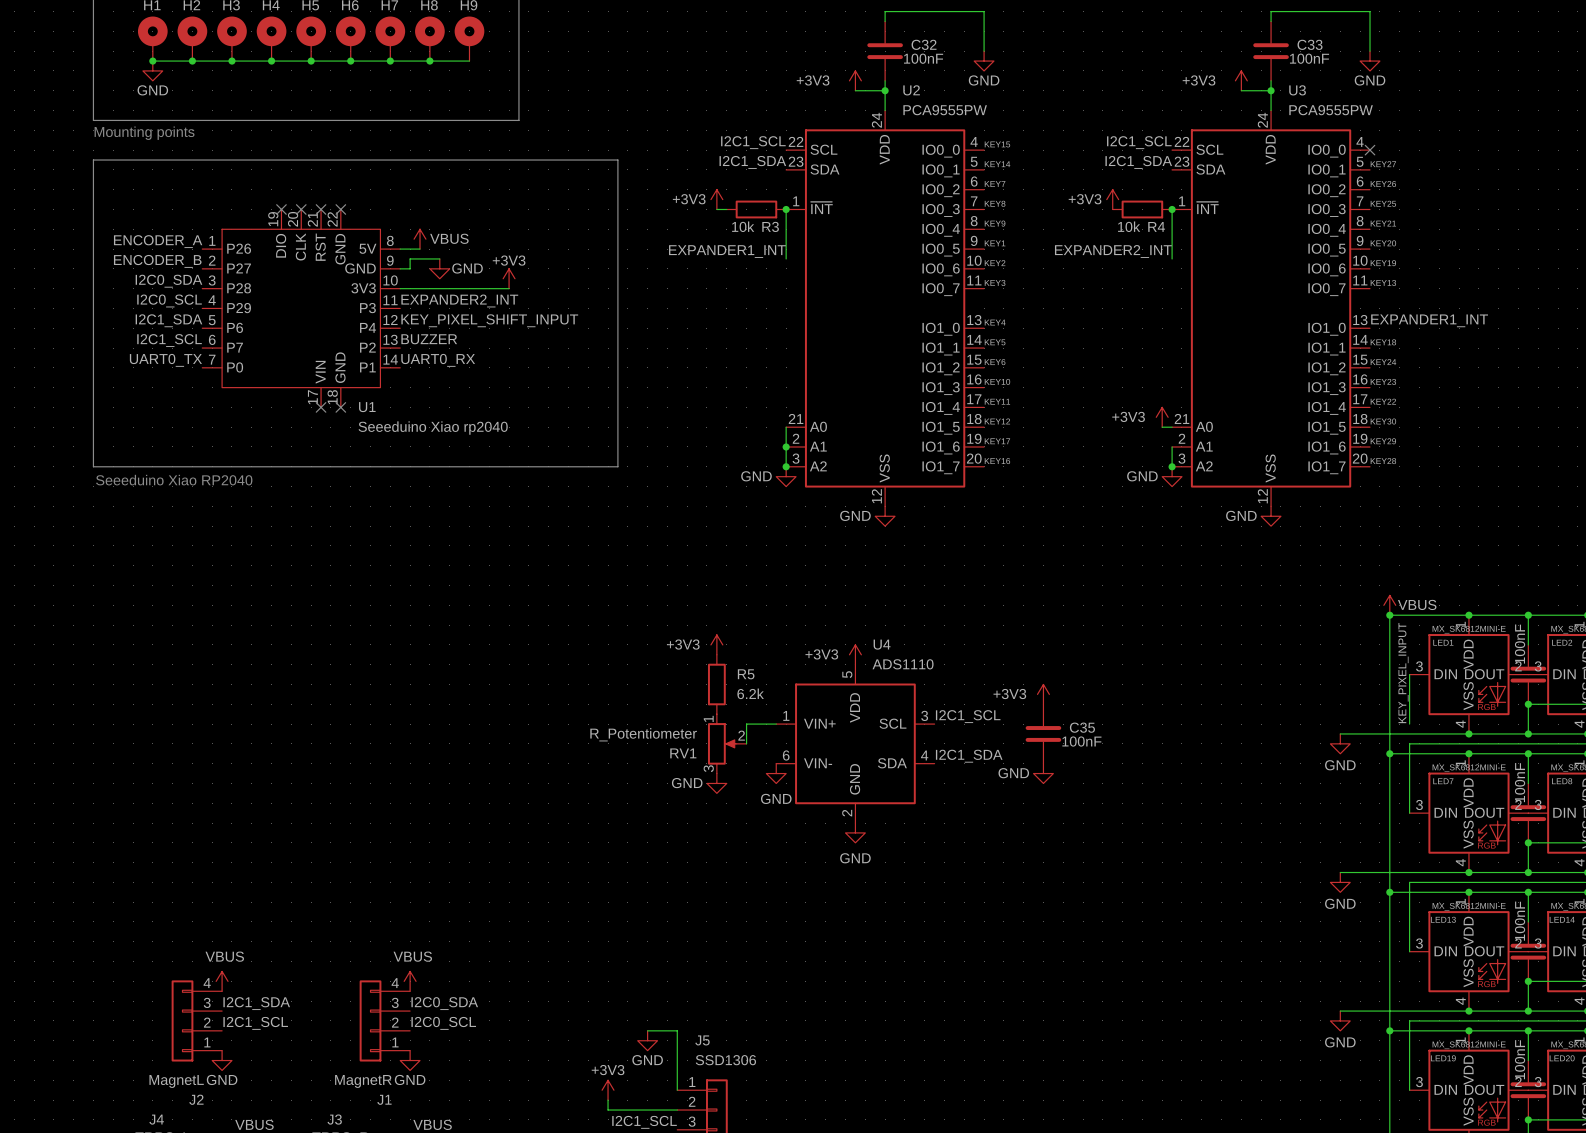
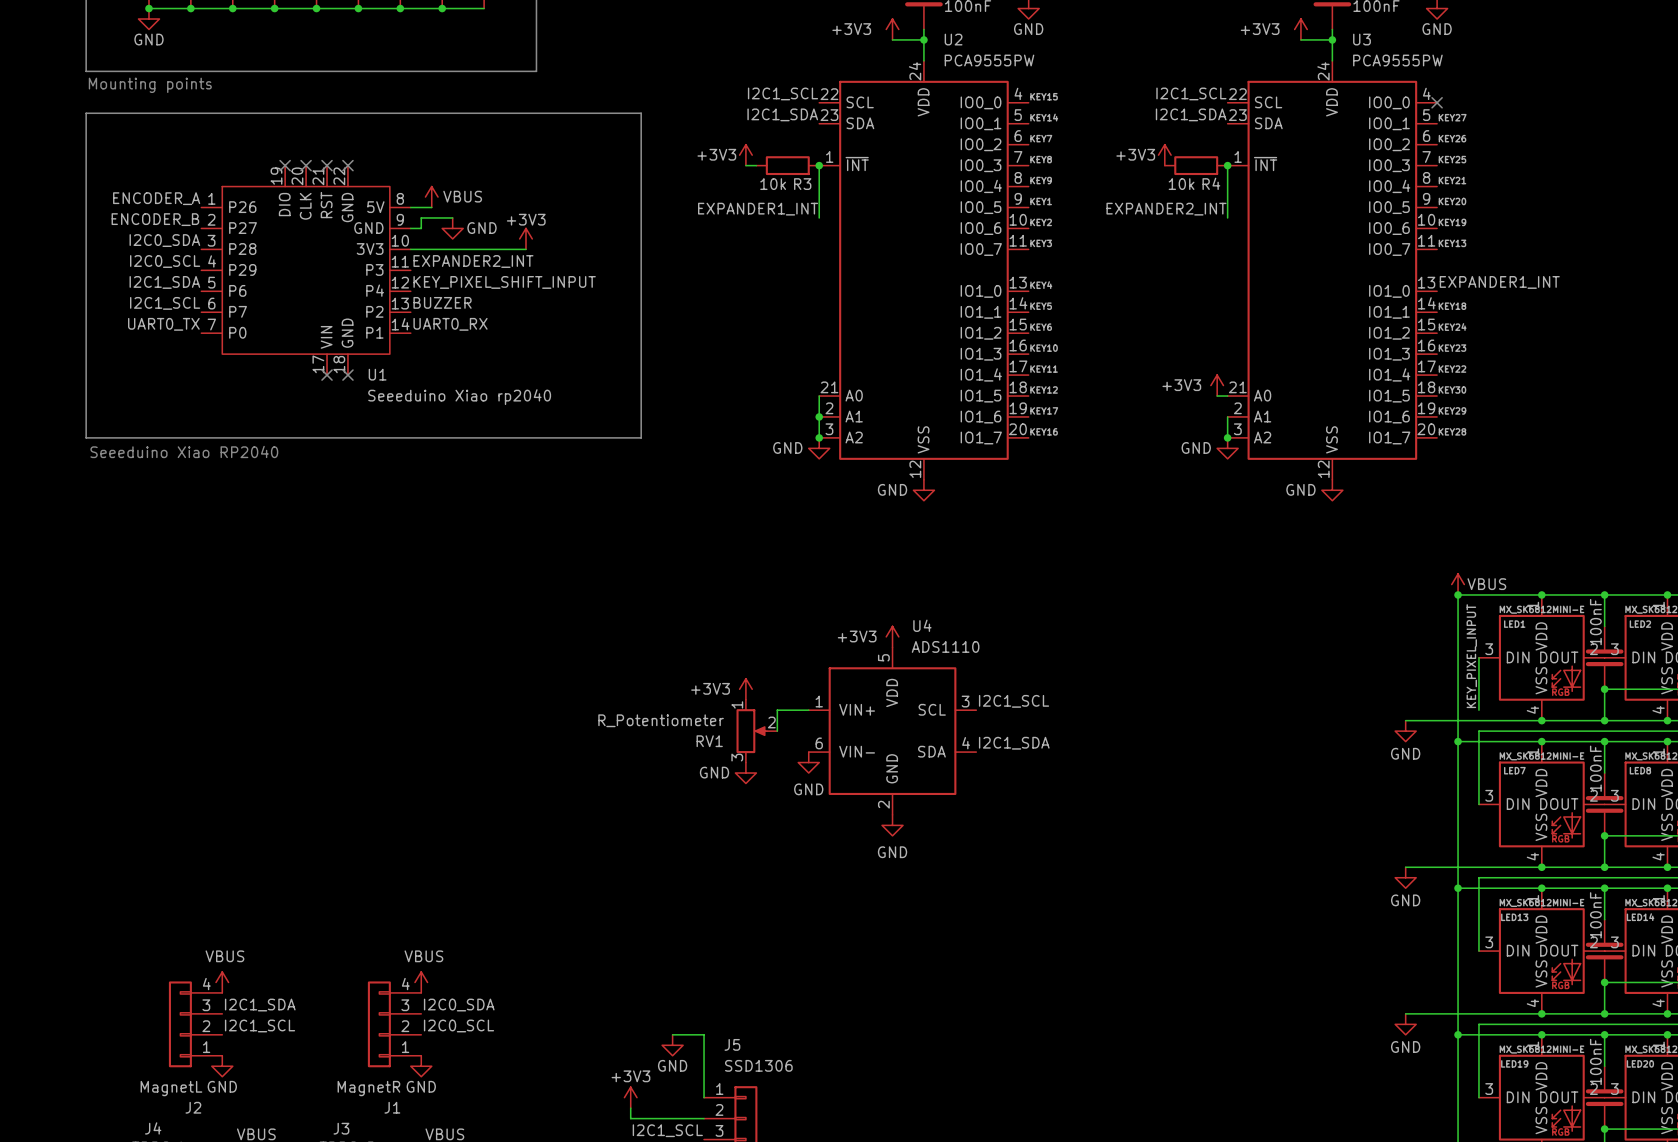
power symbol position: +3V3 (716, 644) -> +3V3 (745, 689)
R5: 6.2k (716, 684) -> none
power symbol: +3V3 (1043, 694) -> none
C35: 100nF (1043, 733) -> none
power symbol: GND (1043, 773) -> none

